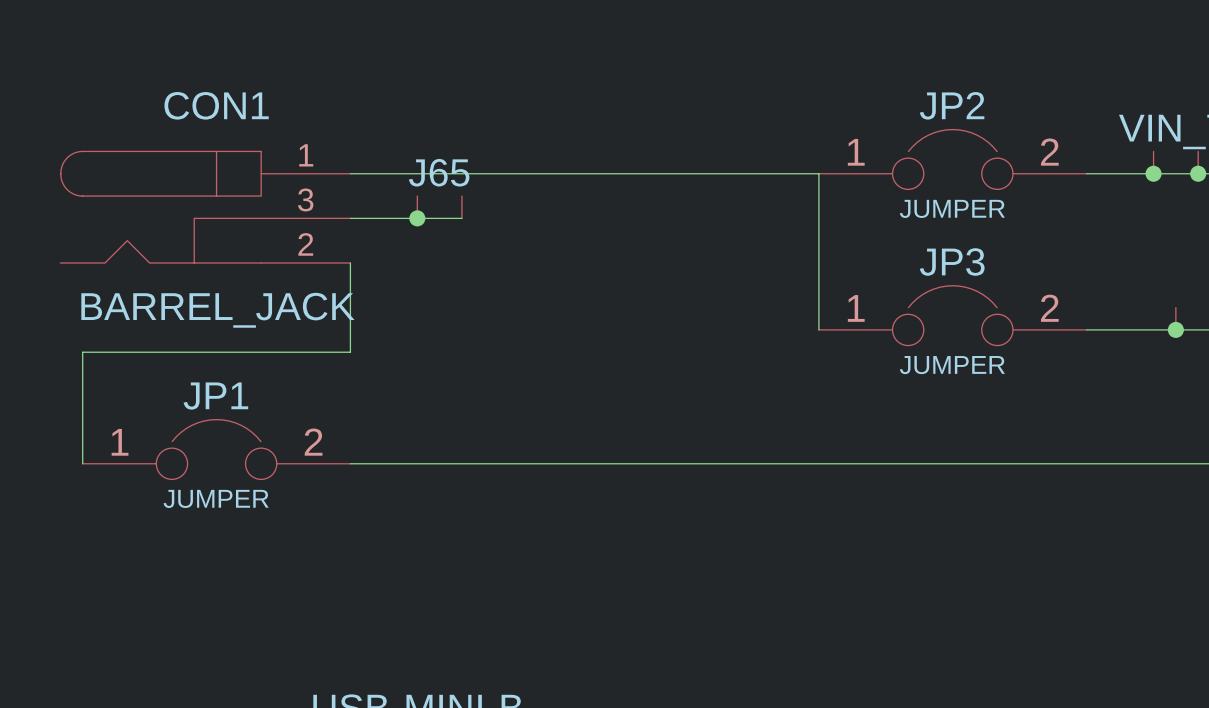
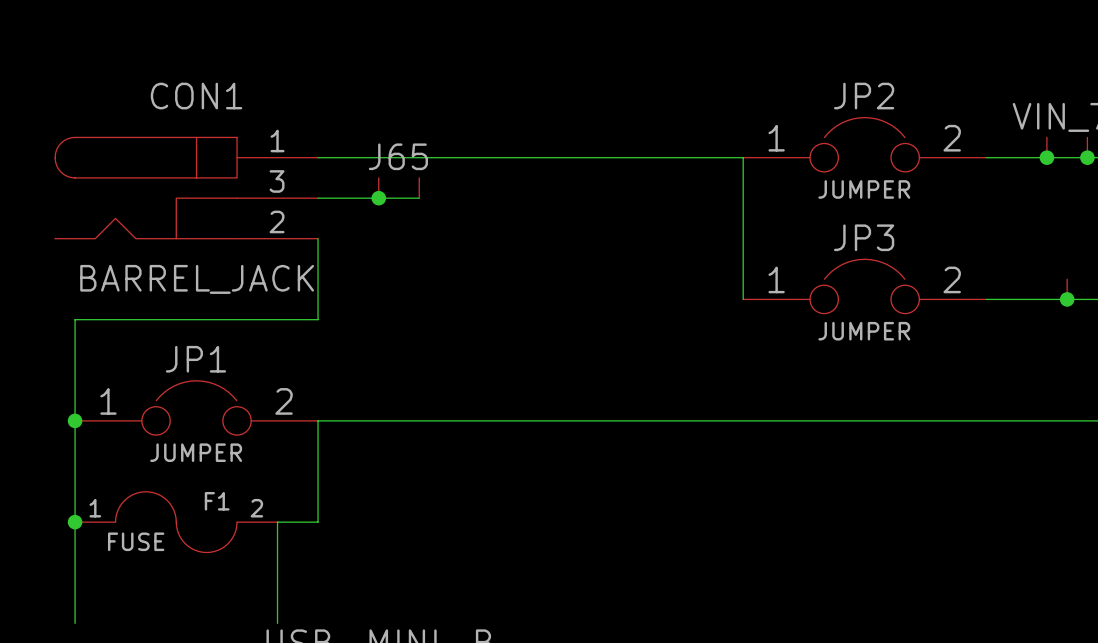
wire: none -> (75, 420) (75, 623)
junction: none -> (75, 420)
wire: none -> (318, 420) (318, 522) (277, 522) (277, 623)
junction: none -> (75, 522)
F1: none -> FUSE (176, 522)

